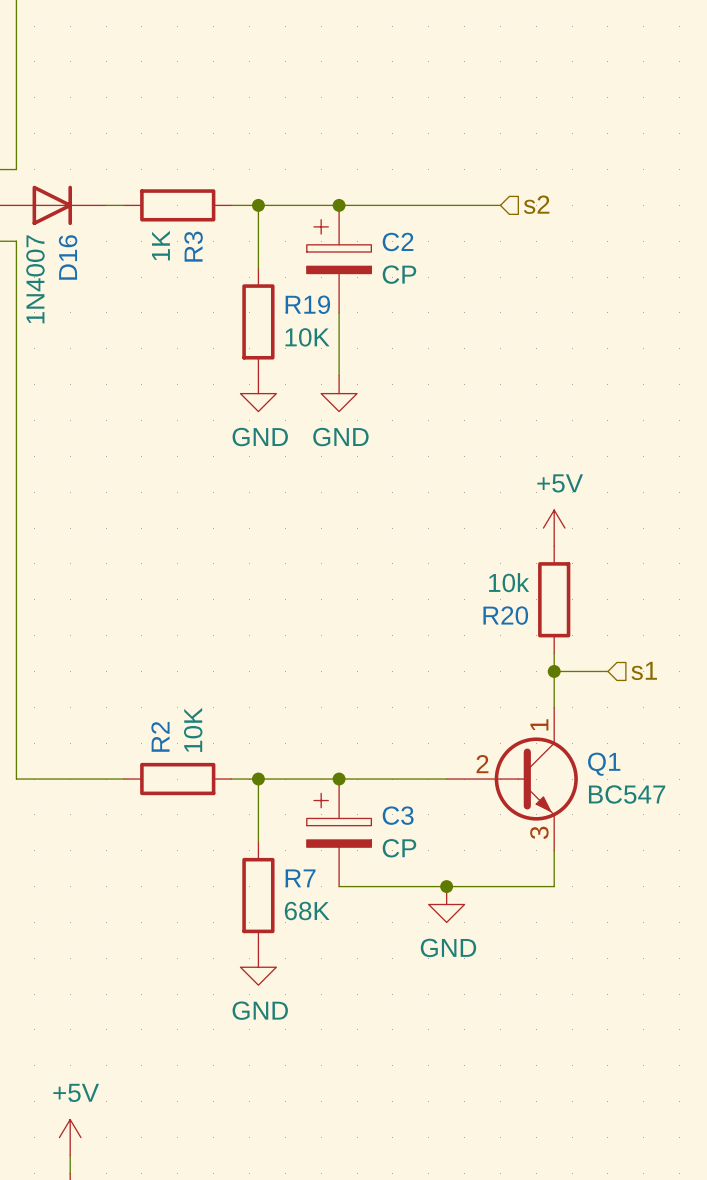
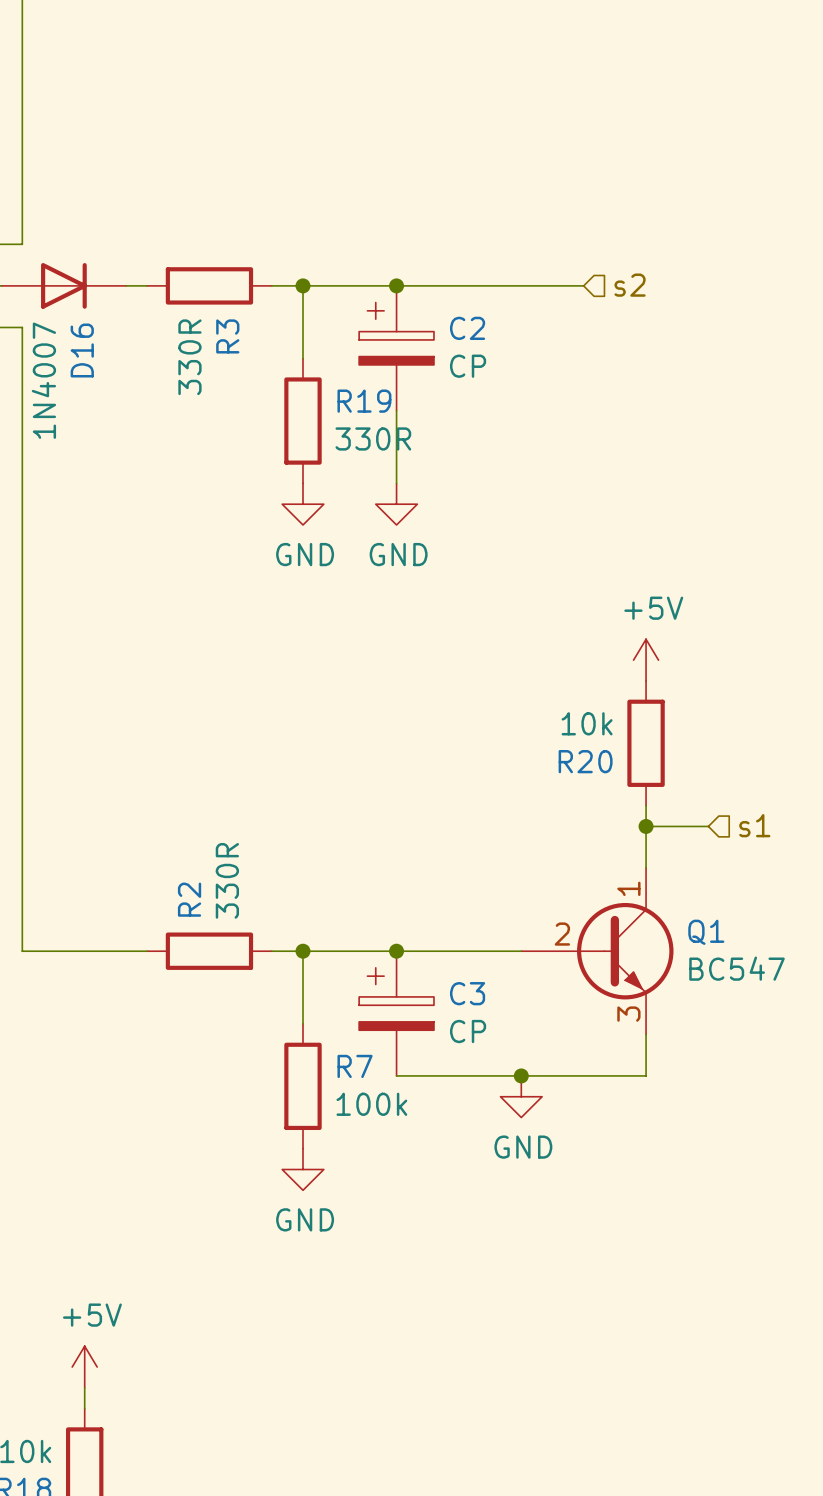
R3 value: 1K (160, 245) -> 330R (189, 357)
R19 value: 10K (307, 337) -> 330R (373, 438)
R2 value: 10K (193, 729) -> 330R (227, 880)
R7 value: 68K (307, 911) -> 100k (371, 1104)

